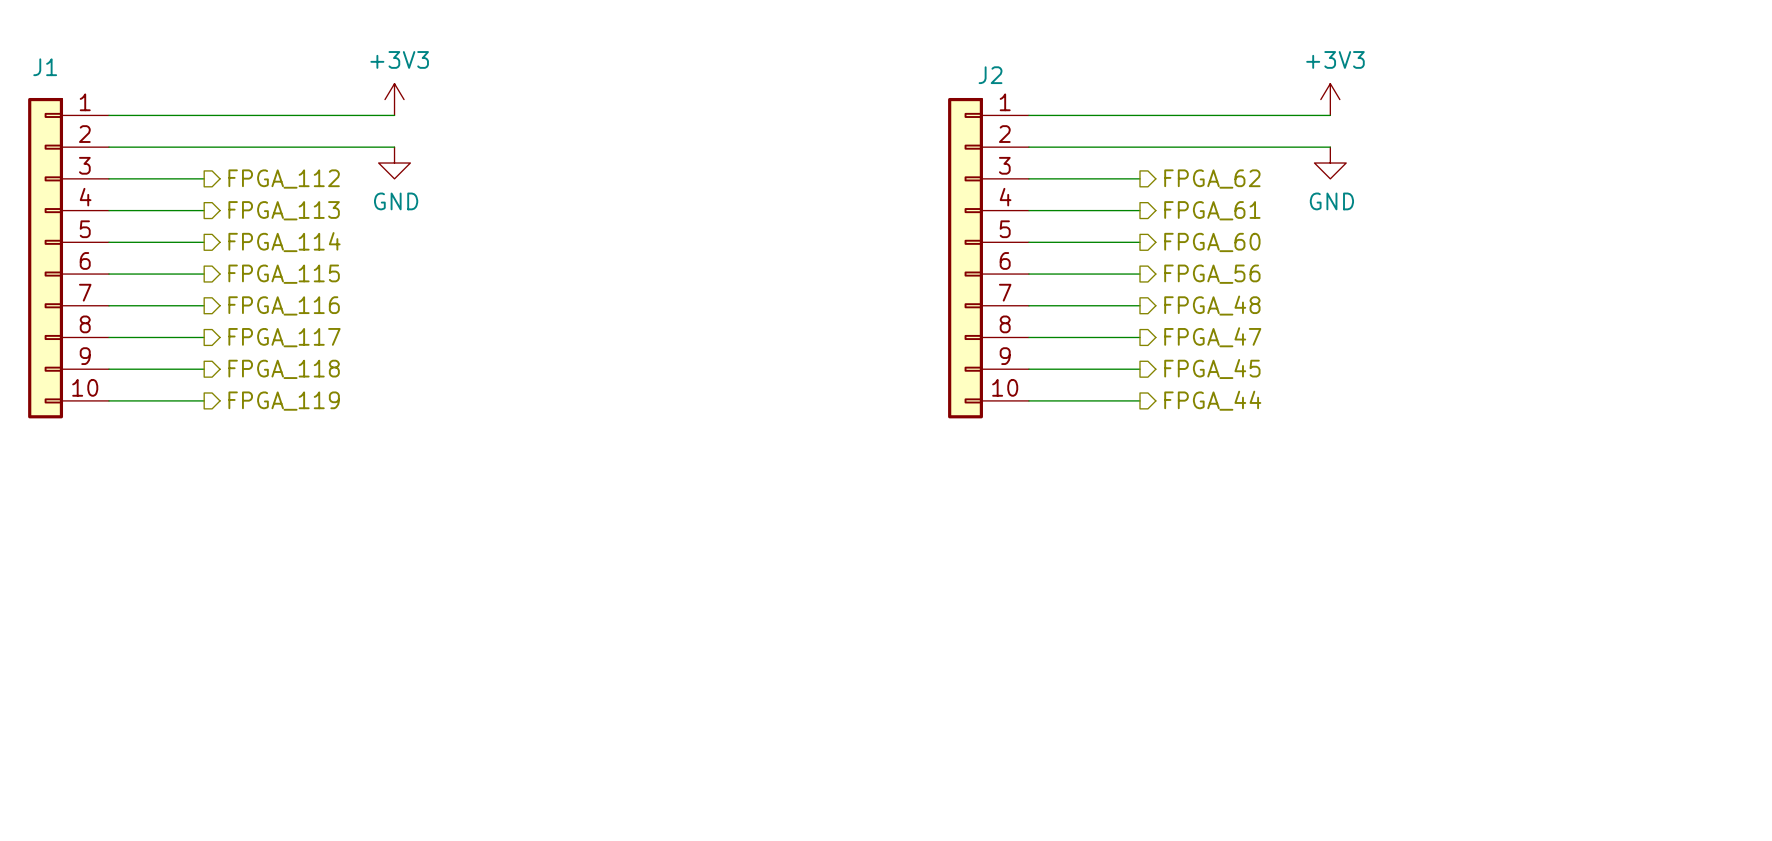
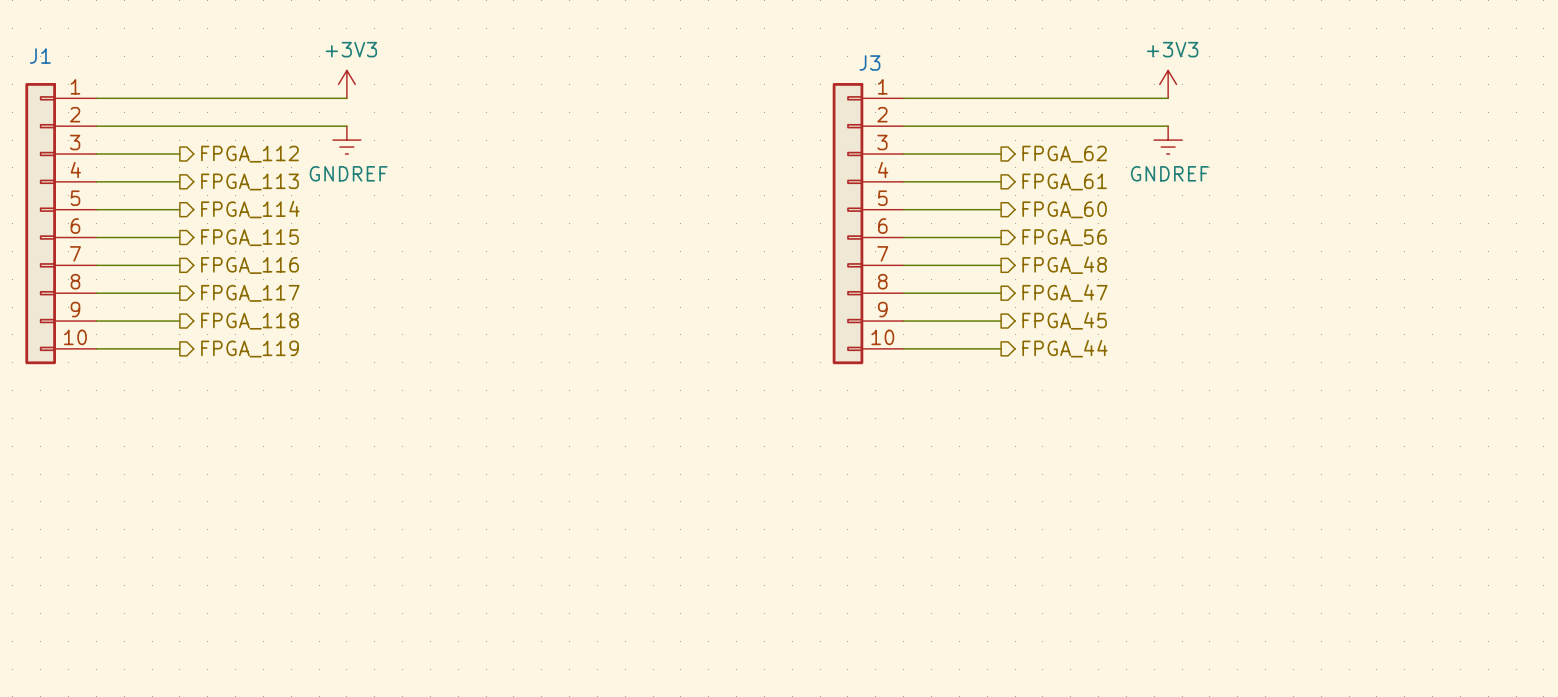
J2 name: J2 (990, 75) -> J3 (869, 63)
power symbol: GND (394, 163) -> GNDREF (346, 140)
power symbol: GND (1330, 163) -> GNDREF (1168, 140)

